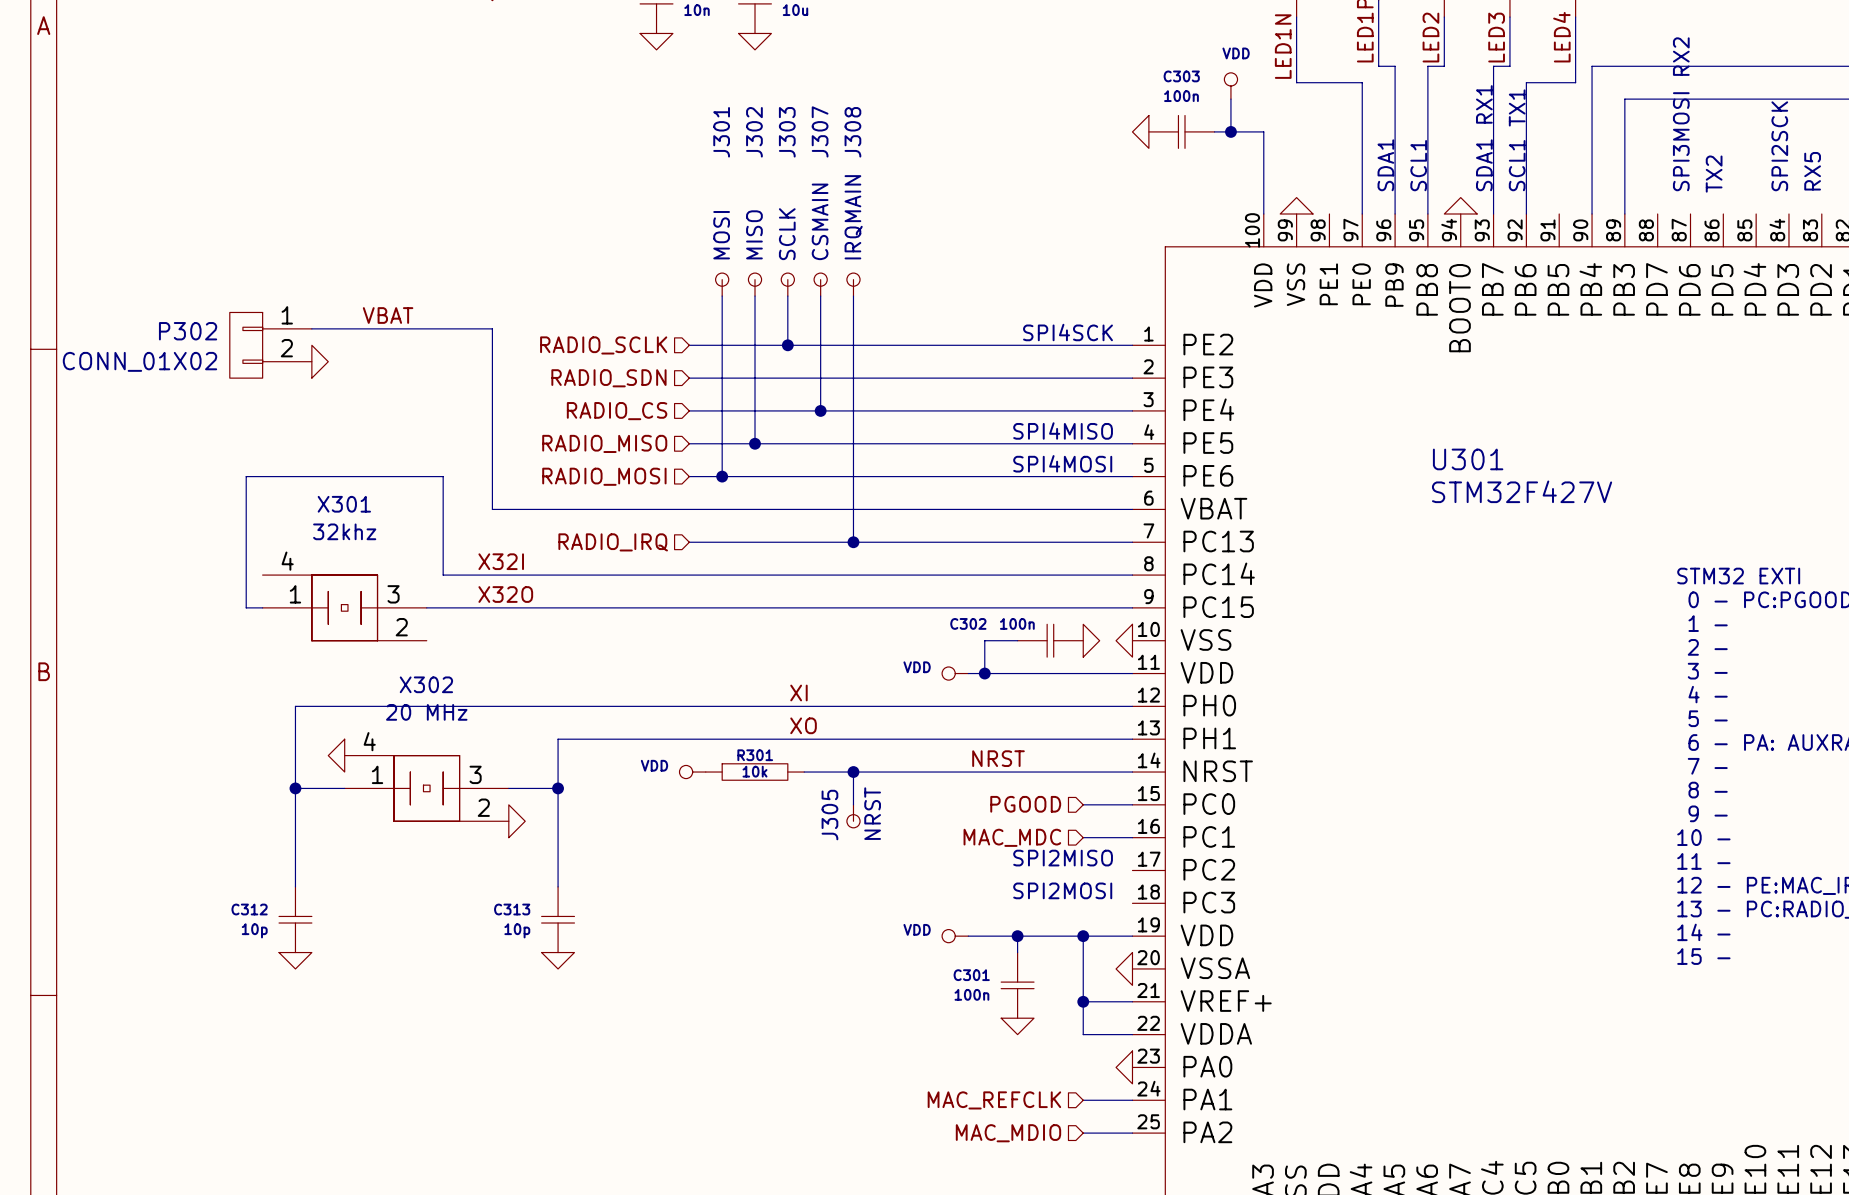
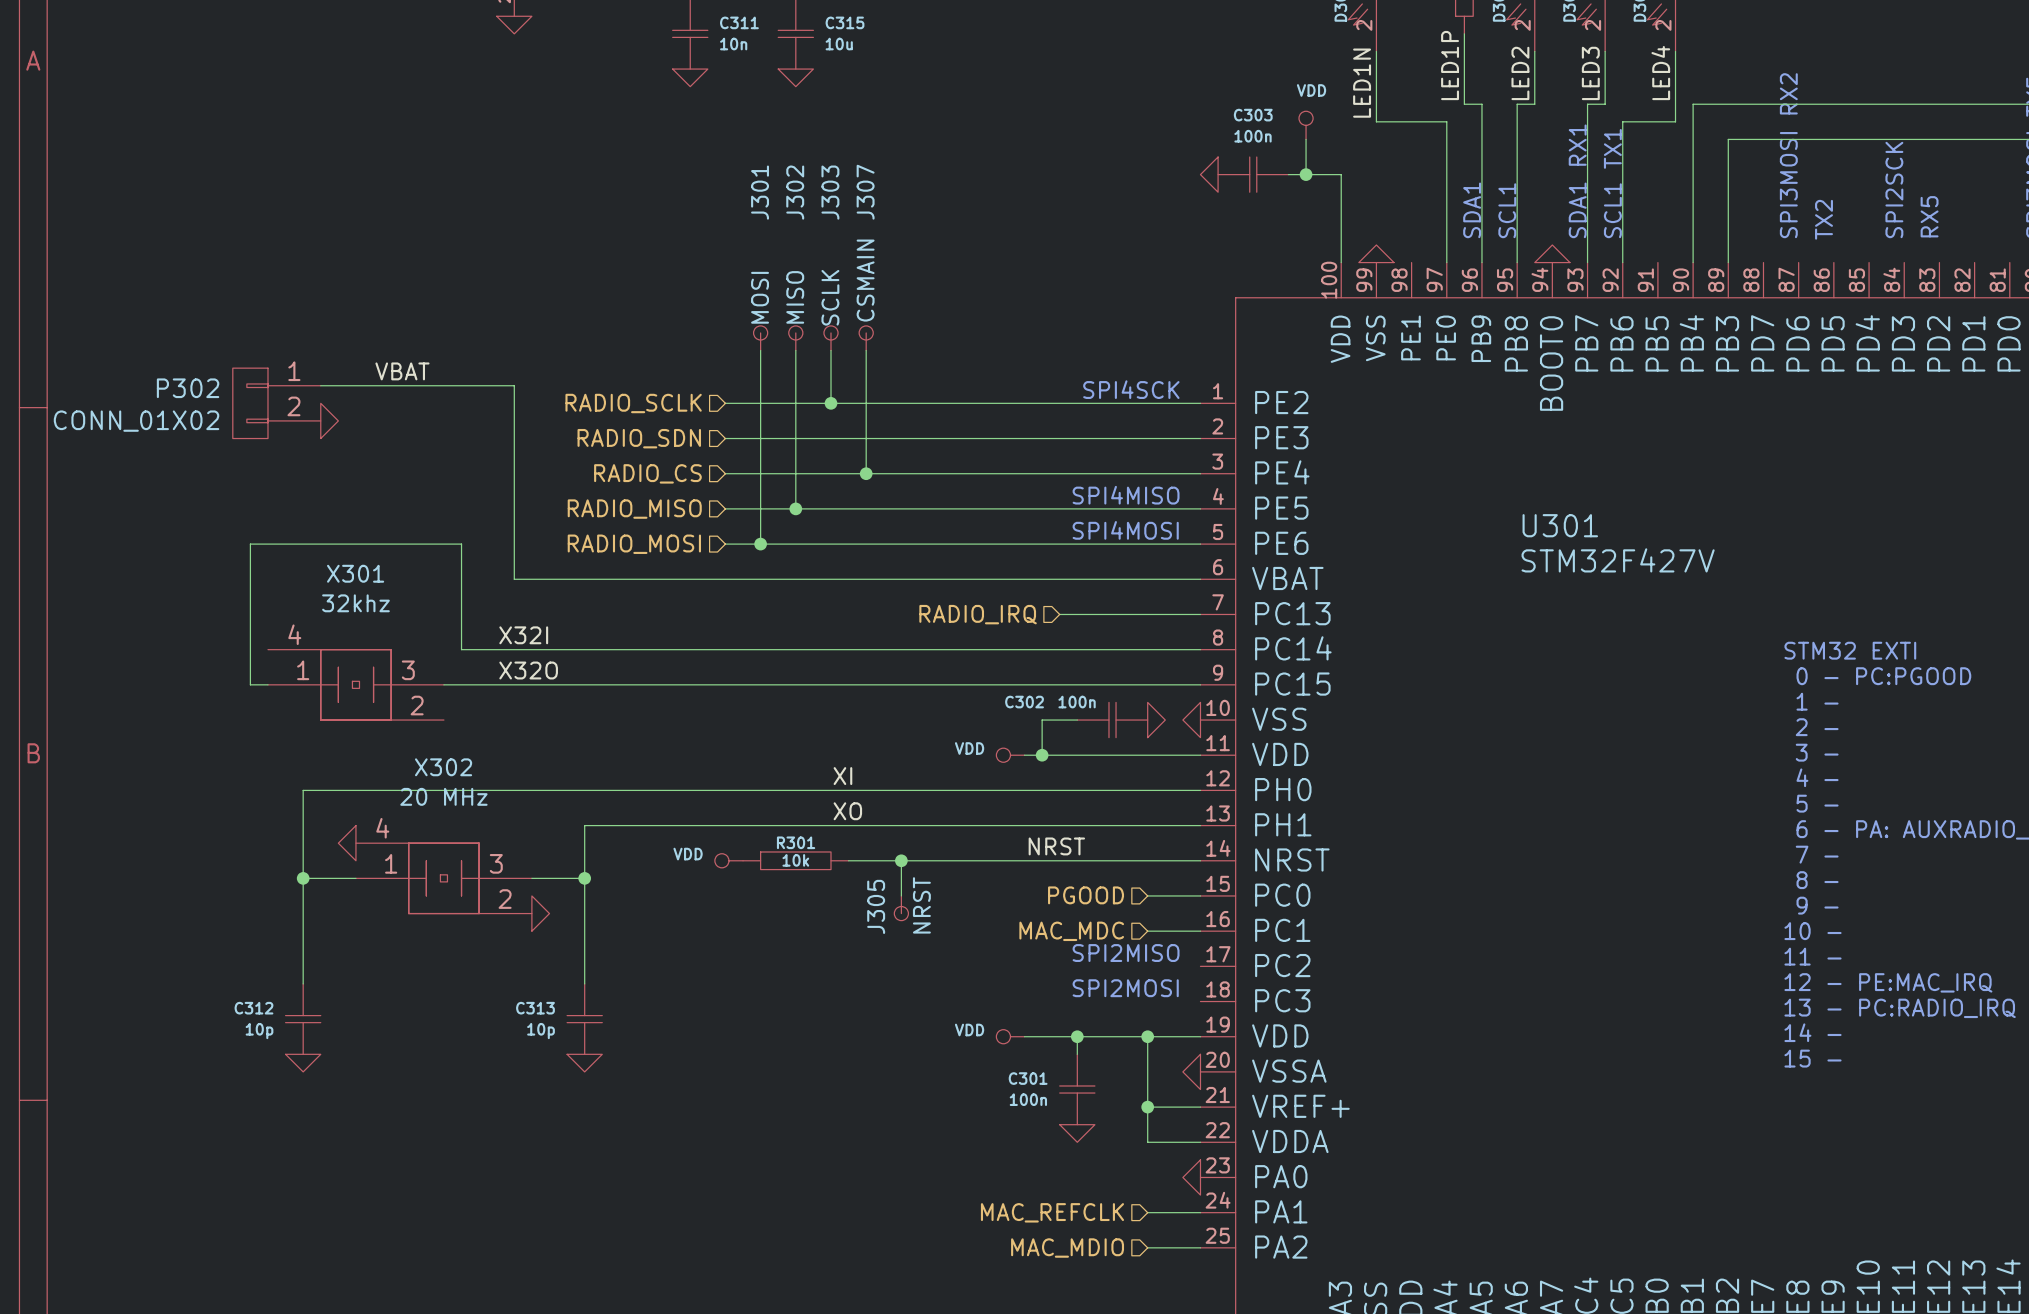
J307 name position: J307 (820, 131) -> J307 (865, 192)
J301 name position: J301 (721, 132) -> J301 (760, 192)
J302 name position: J302 (754, 132) -> J302 (795, 192)
J303 name position: J303 (787, 132) -> J303 (830, 192)
J307 value position: CSMAIN (820, 221) -> CSMAIN (865, 280)
J302 value position: MISO (754, 234) -> MISO (795, 297)
J303 value position: SCLK (787, 234) -> SCLK (830, 297)
J301 value position: MOSI (721, 235) -> MOSI (760, 297)
J308: IRQMAIN (853, 284) -> none
wire: (853, 296) (853, 542) -> none
hierarchical label position: RADIO_IRQ (613, 542) -> RADIO_IRQ (978, 614)
wire: (689, 542) (1001, 542) -> none
junction: (853, 542) -> none

